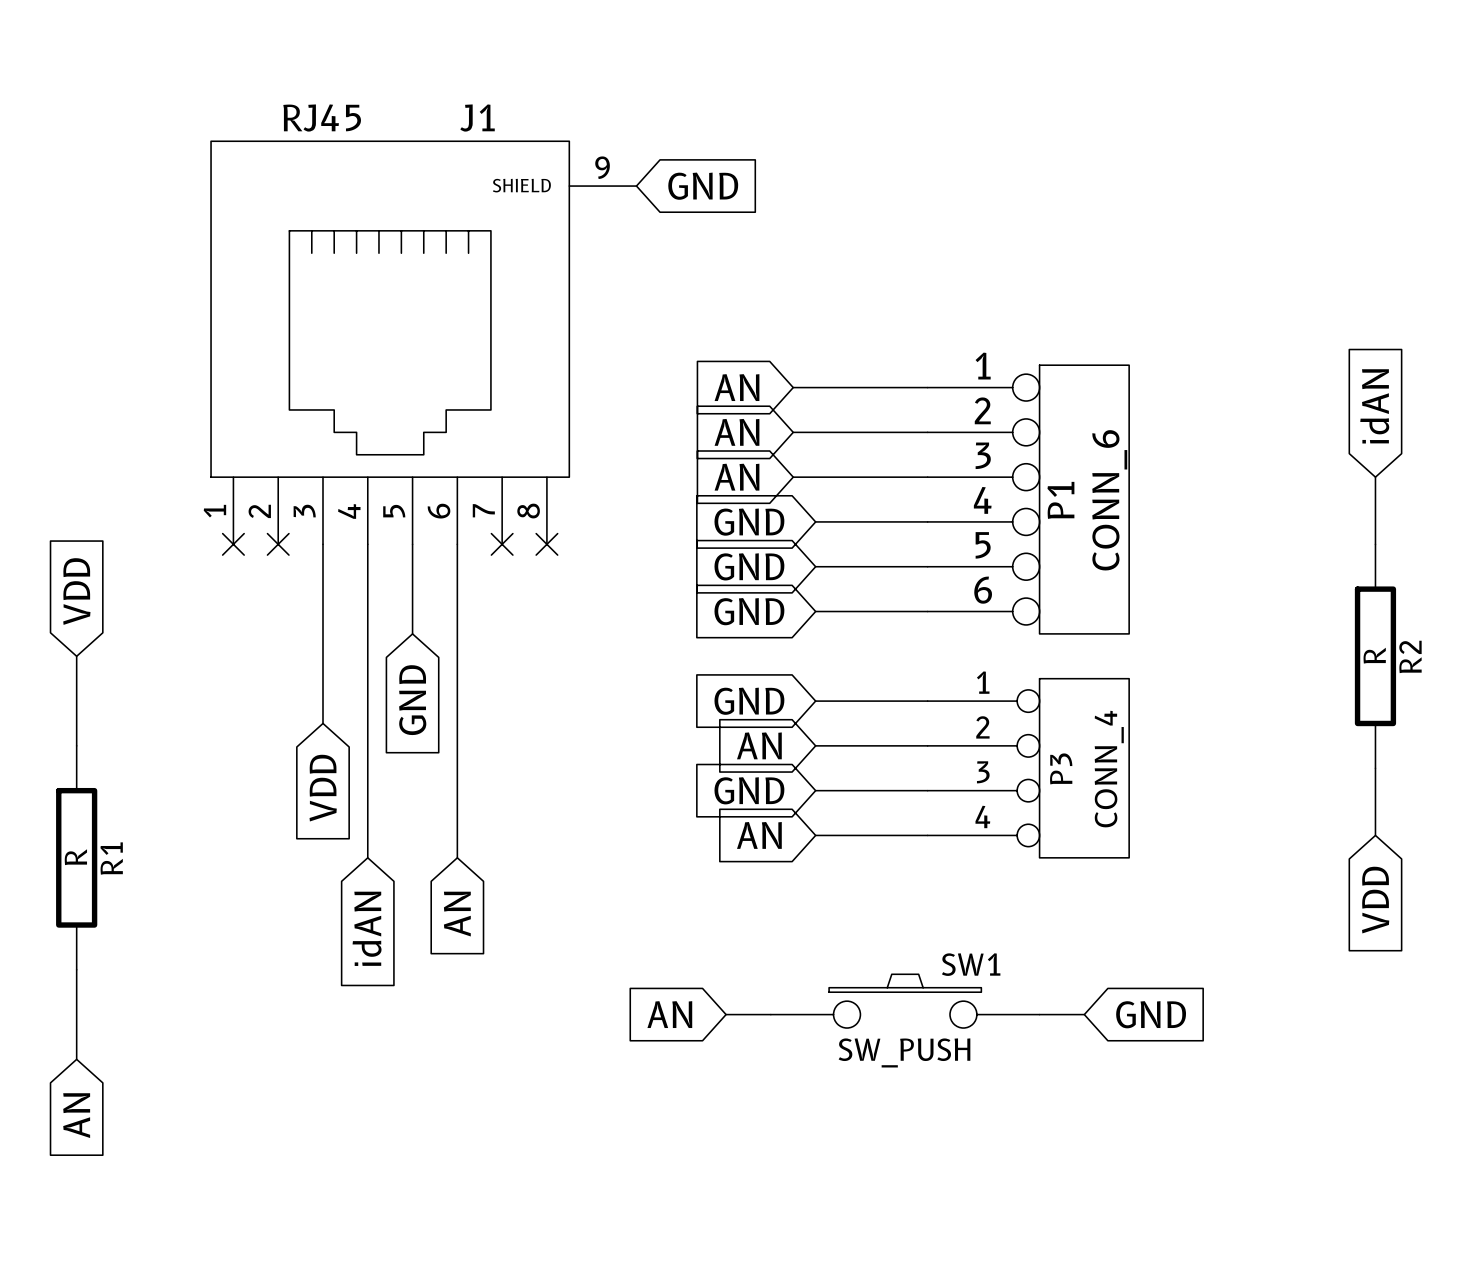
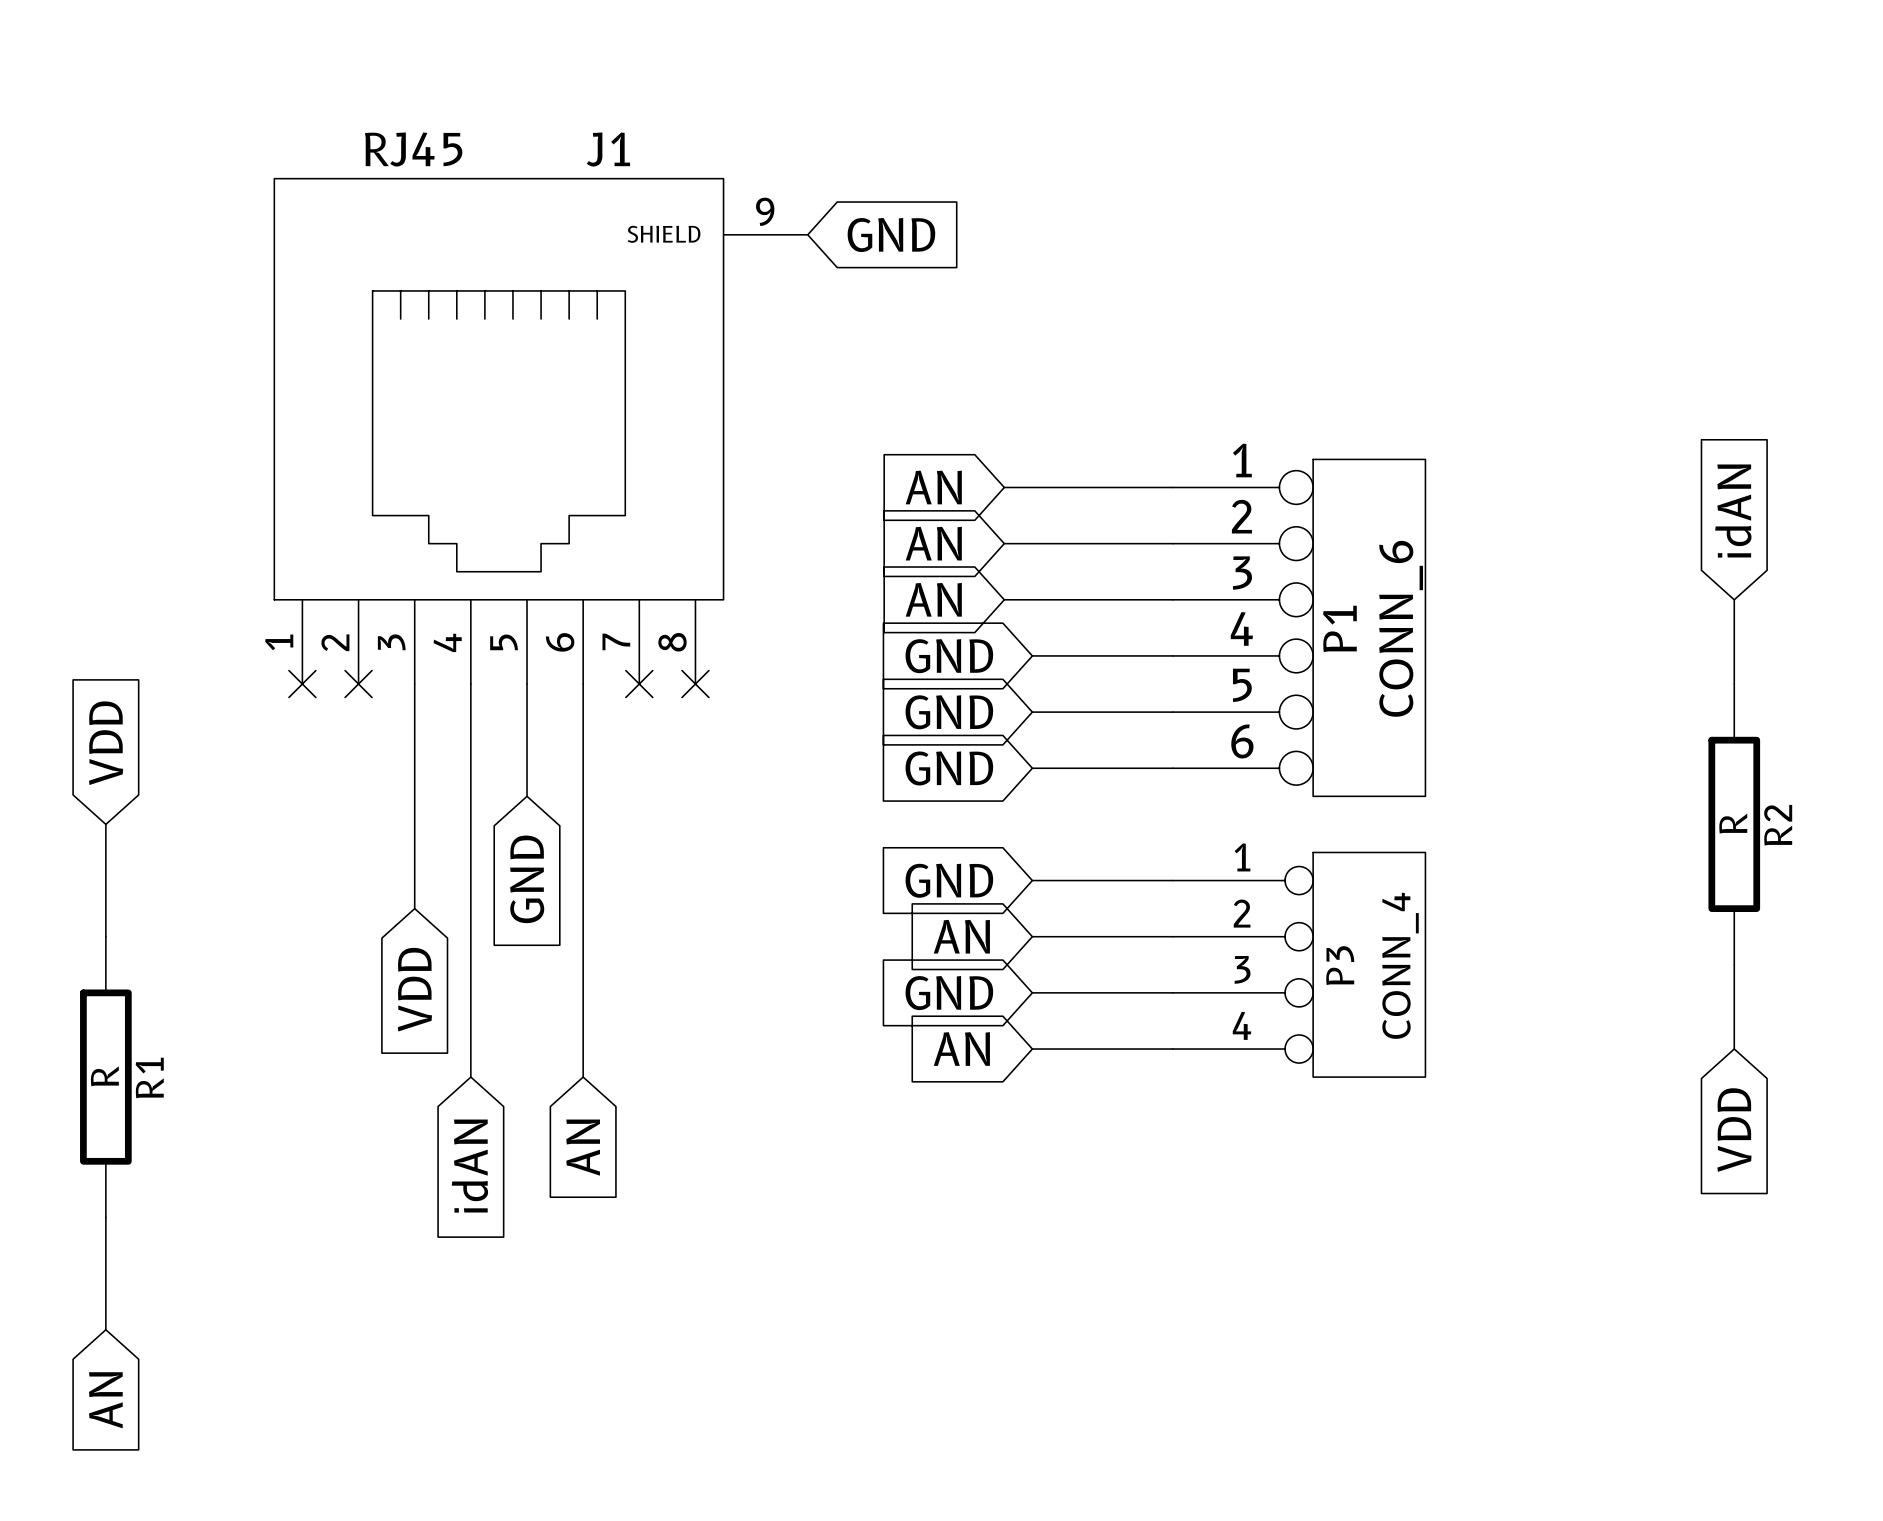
SW1: SW_PUSH (905, 1001) -> none
global label: AN (669, 1014) -> none
wire: (726, 1014) (770, 1014) -> none
wire: (1039, 1014) (1084, 1014) -> none
global label: GND (1151, 1014) -> none

